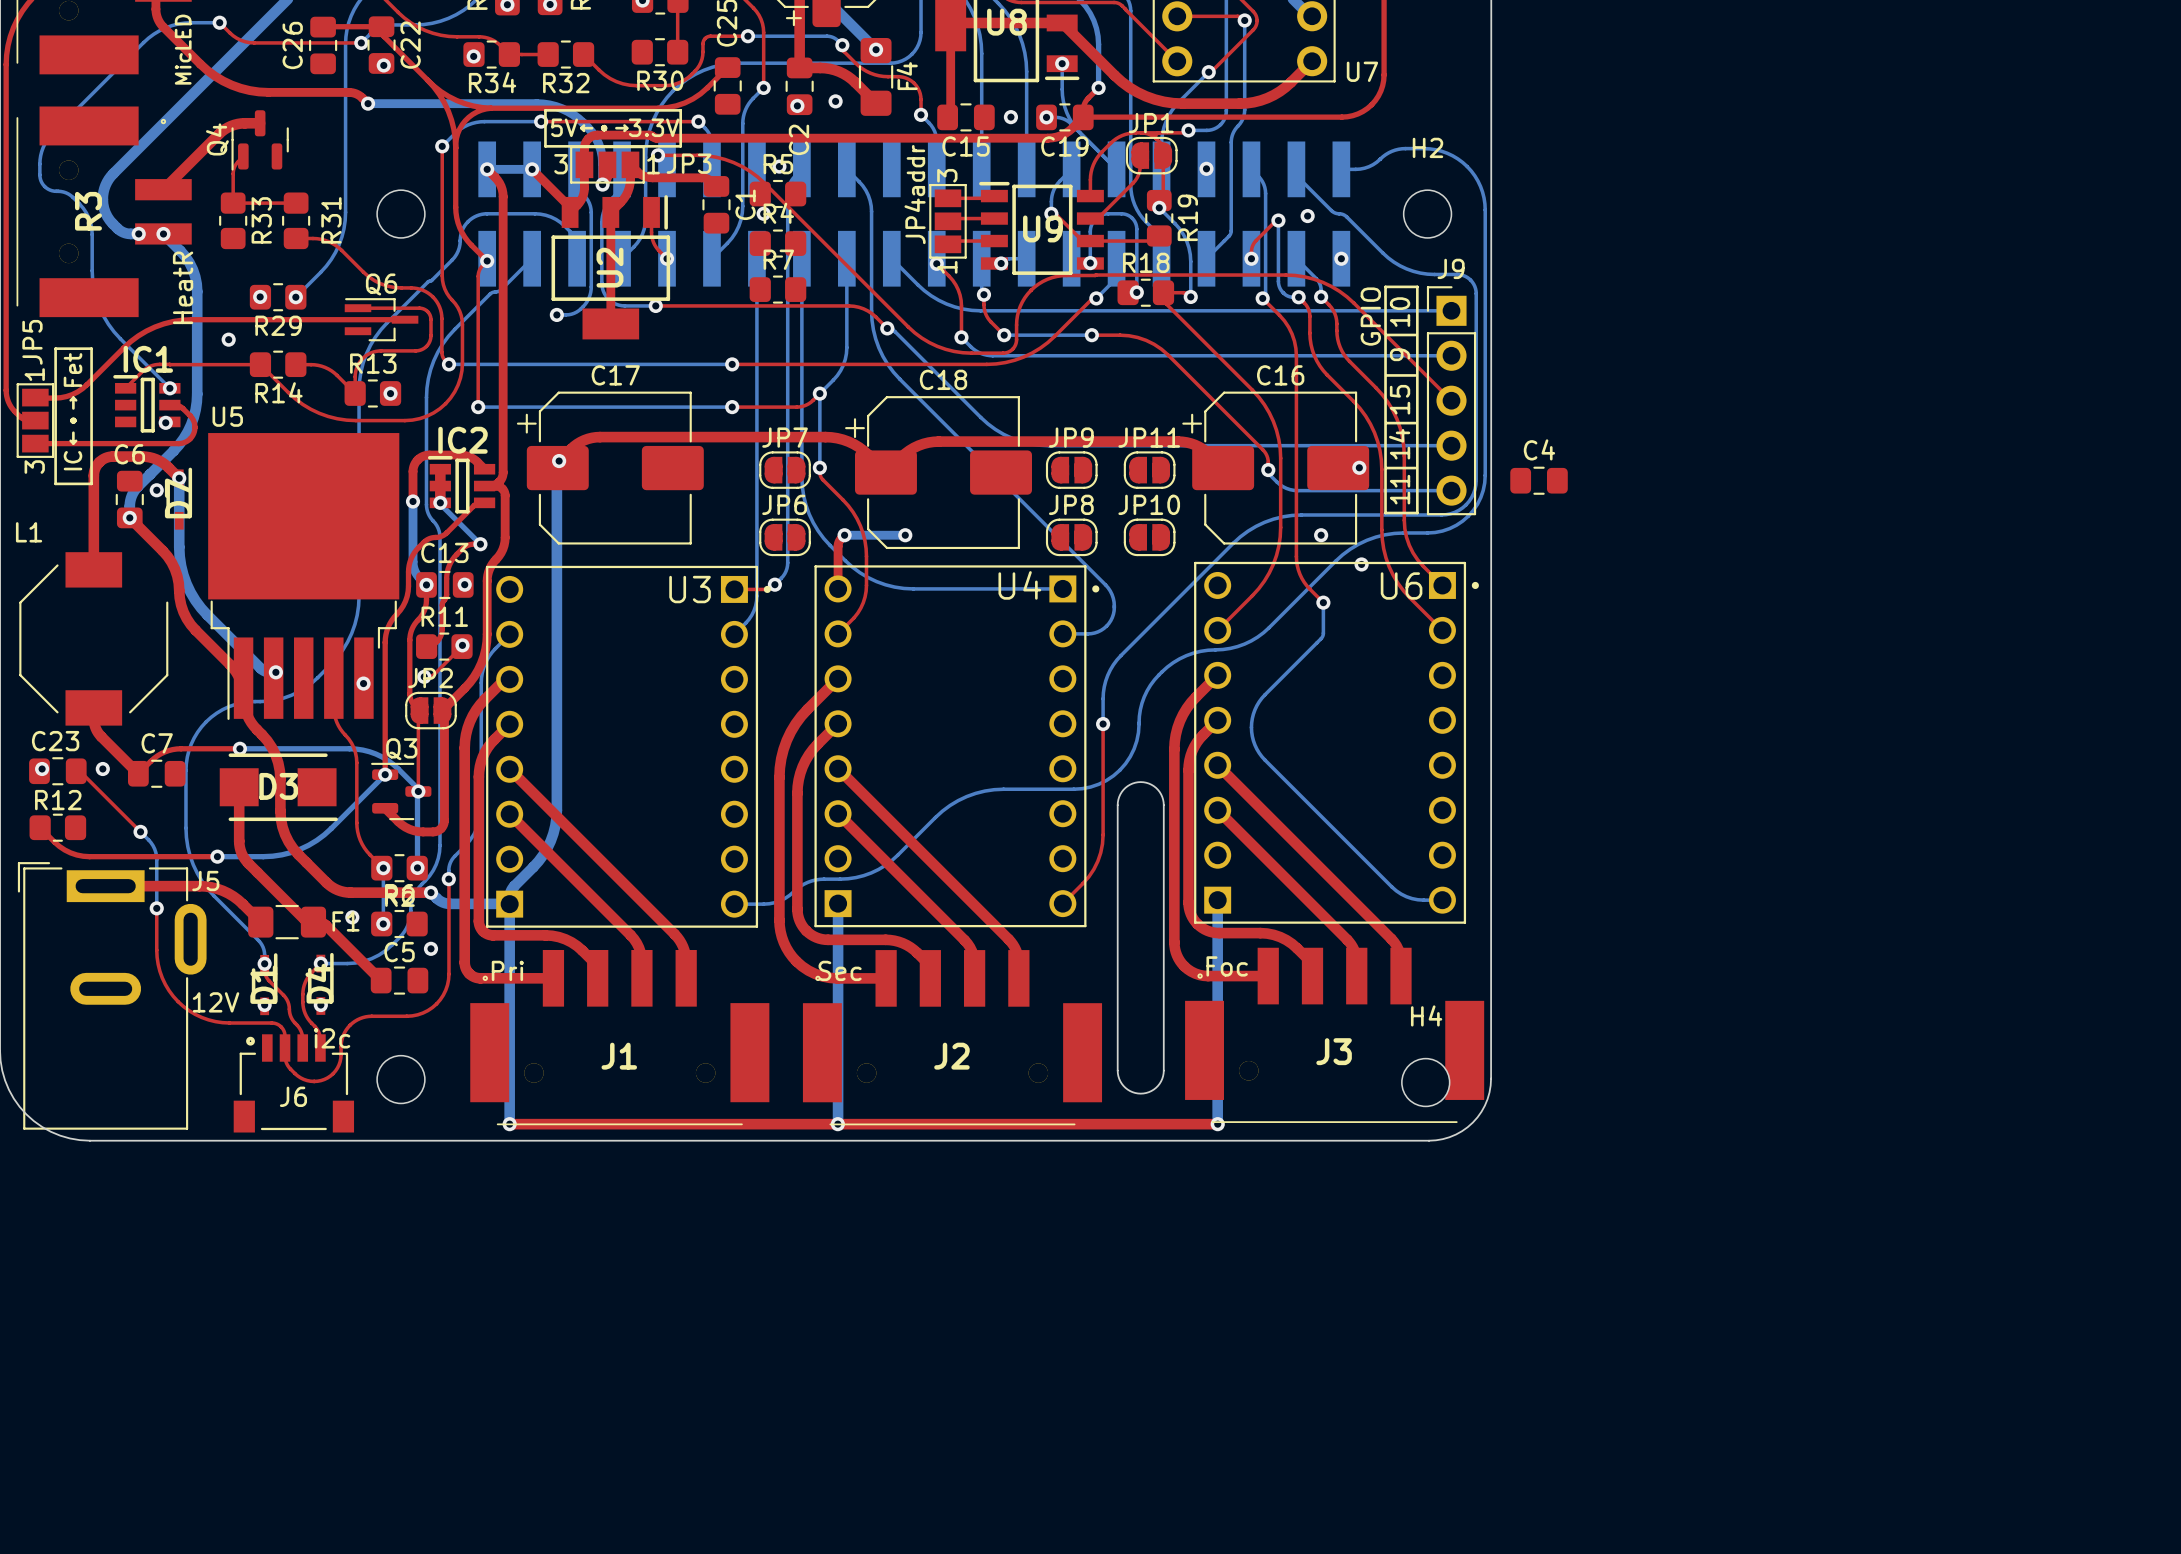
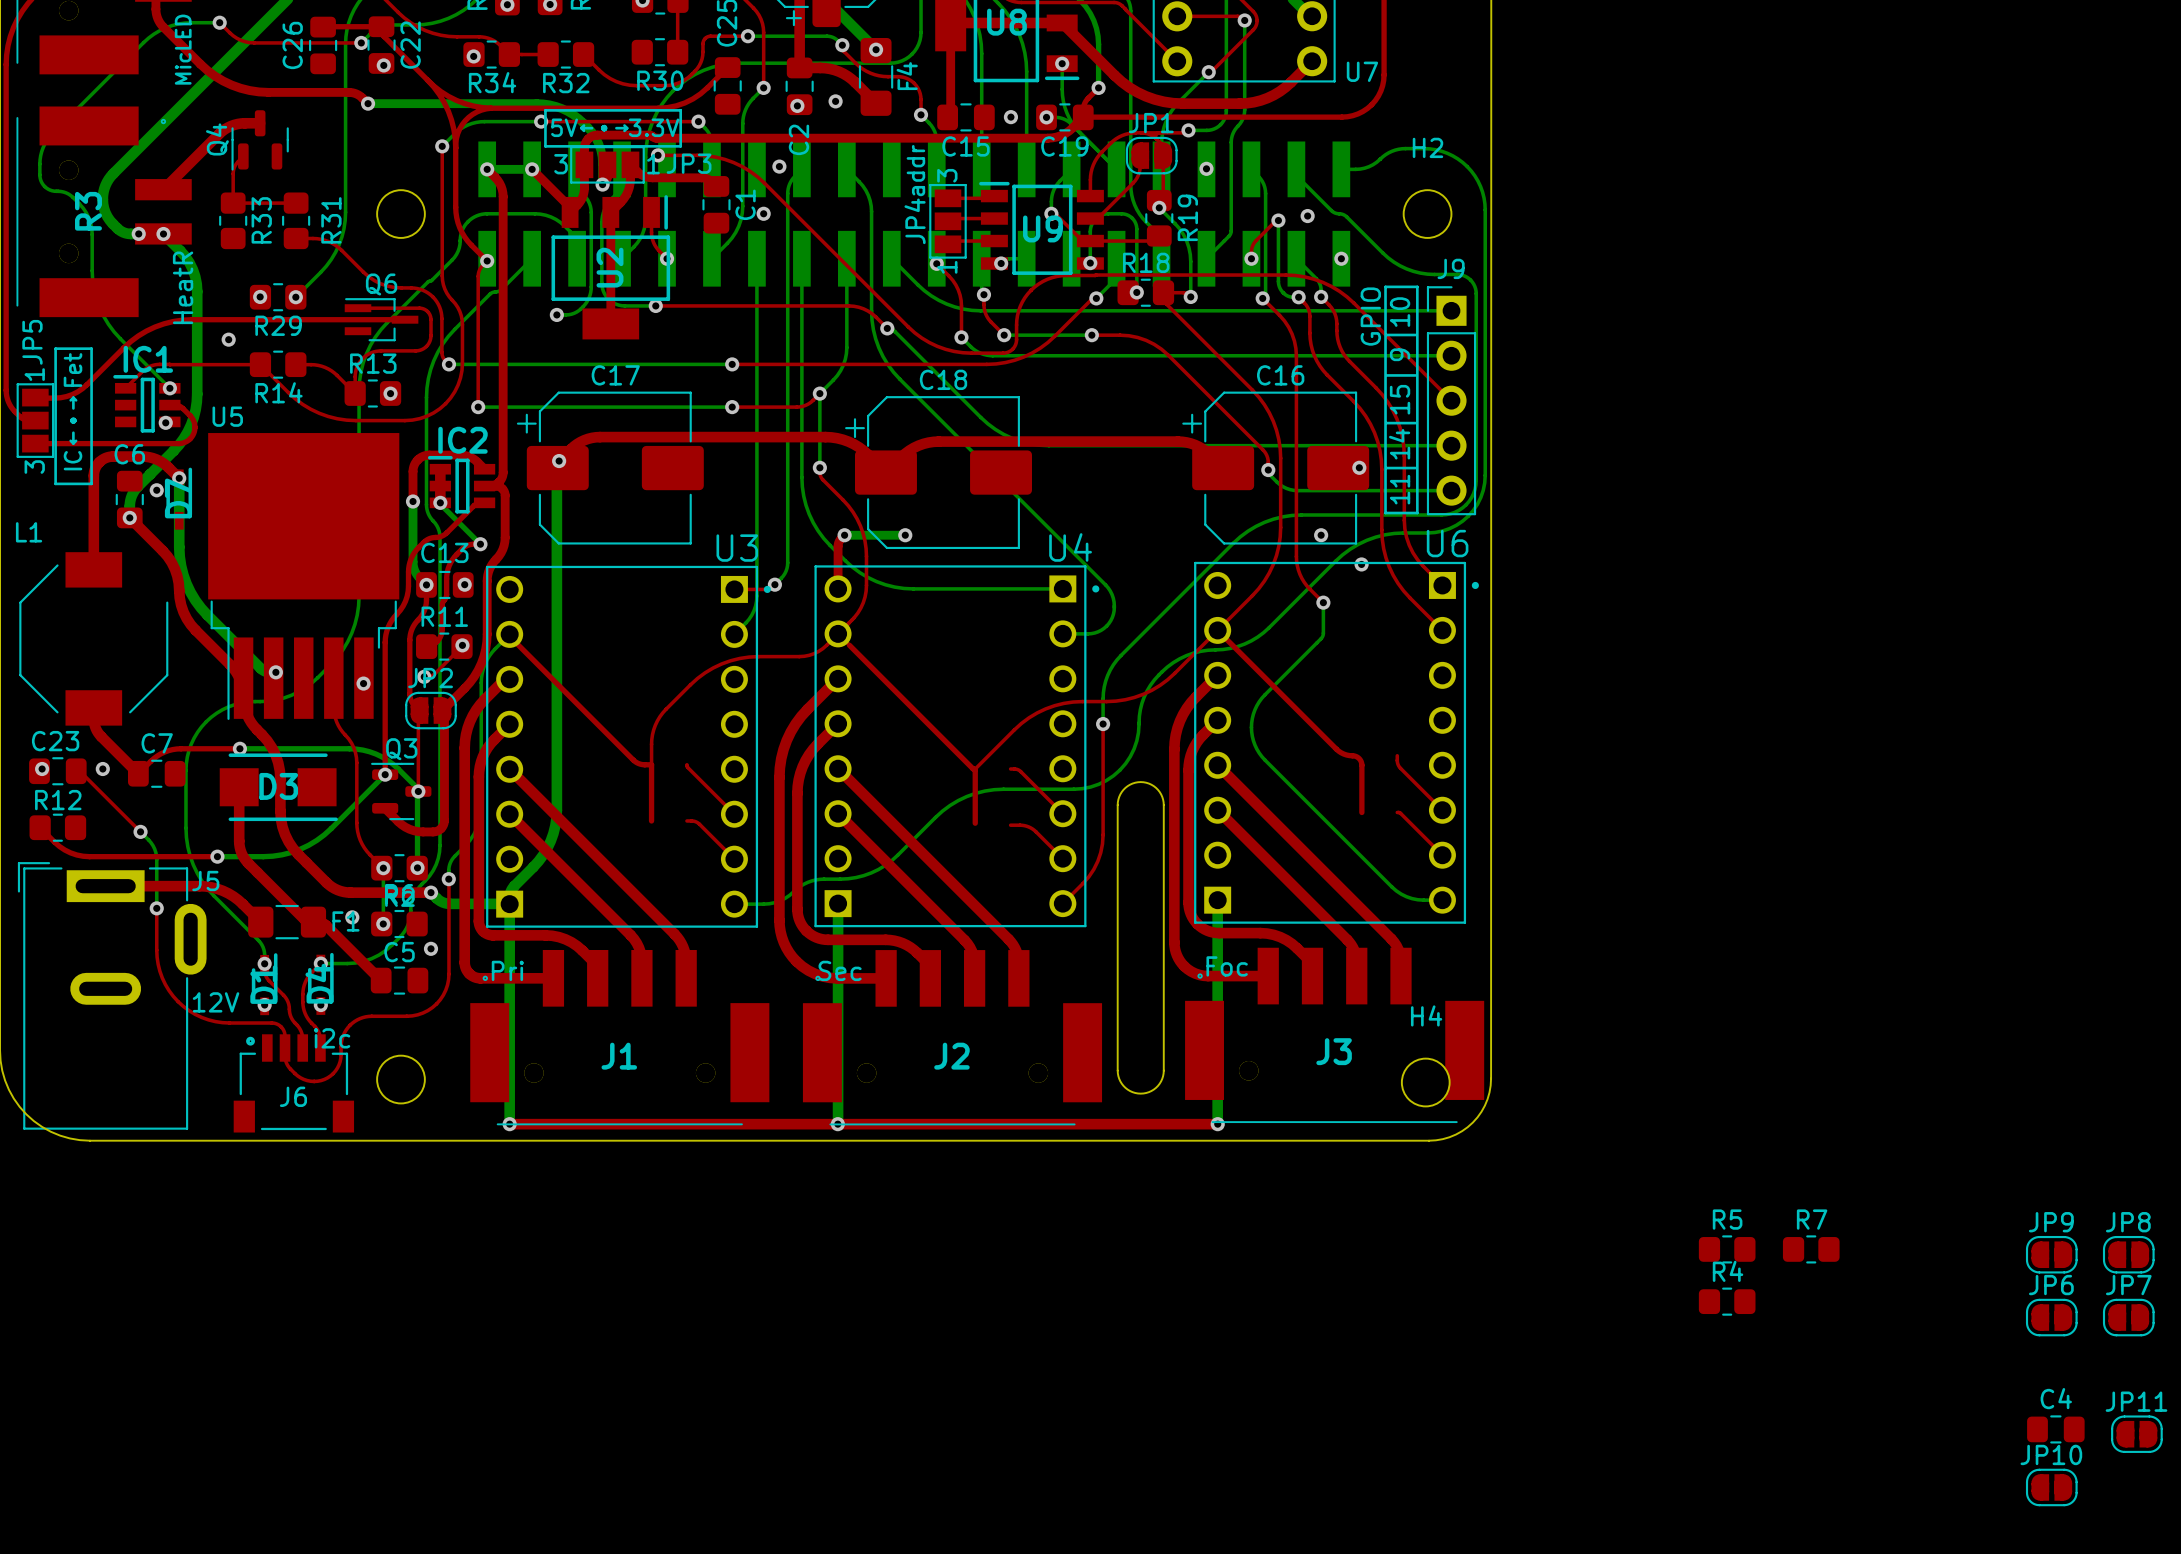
R5 position: (777, 194) -> (1727, 1249)
R4 position: (777, 243) -> (1727, 1301)
R7 position: (777, 289) -> (1811, 1249)
JP7 position: (785, 470) -> (2128, 1317)
JP9 position: (1071, 470) -> (2051, 1254)
JP11 position: (1149, 470) -> (2136, 1434)
C4 position: (1539, 480) -> (2055, 1429)
JP6 position: (785, 537) -> (2051, 1317)
JP8 position: (1071, 537) -> (2128, 1254)
JP10 position: (1149, 537) -> (2051, 1487)
U4 name position: U4 (1019, 585) -> U4 (1070, 547)
U6 name position: U6 (1401, 586) -> U6 (1447, 543)
U3 name position: U3 (690, 589) -> U3 (737, 548)
top track: none -> (849, 622) (844, 633) (848, 643) (975, 769) (975, 823)
top track: none -> (838, 633) (822, 648) (809, 655) (739, 658) (721, 663) (705, 672) (666, 709) (657, 720) (651, 739) (651, 764)
top track: none -> (510, 637) (634, 761) (641, 764) (651, 764)
top track: none -> (1397, 755) (1399, 767) (1442, 810)
top track: none -> (651, 764) (651, 820)
top track: none -> (686, 764) (734, 814)
top track: none -> (975, 769) (1021, 723) (1045, 708) (1073, 702) (1125, 699) (1152, 690) (1174, 673) (1217, 630) (1336, 749) (1343, 754) (1354, 756) (1359, 759) (1361, 765) (1361, 812)
top track: none -> (1010, 769) (1020, 771) (1062, 813)
top track: none -> (1397, 812) (1400, 813) (1442, 855)
top track: none -> (686, 820) (698, 823) (734, 859)
top track: none -> (1010, 825) (1024, 825) (1032, 829) (1062, 858)

